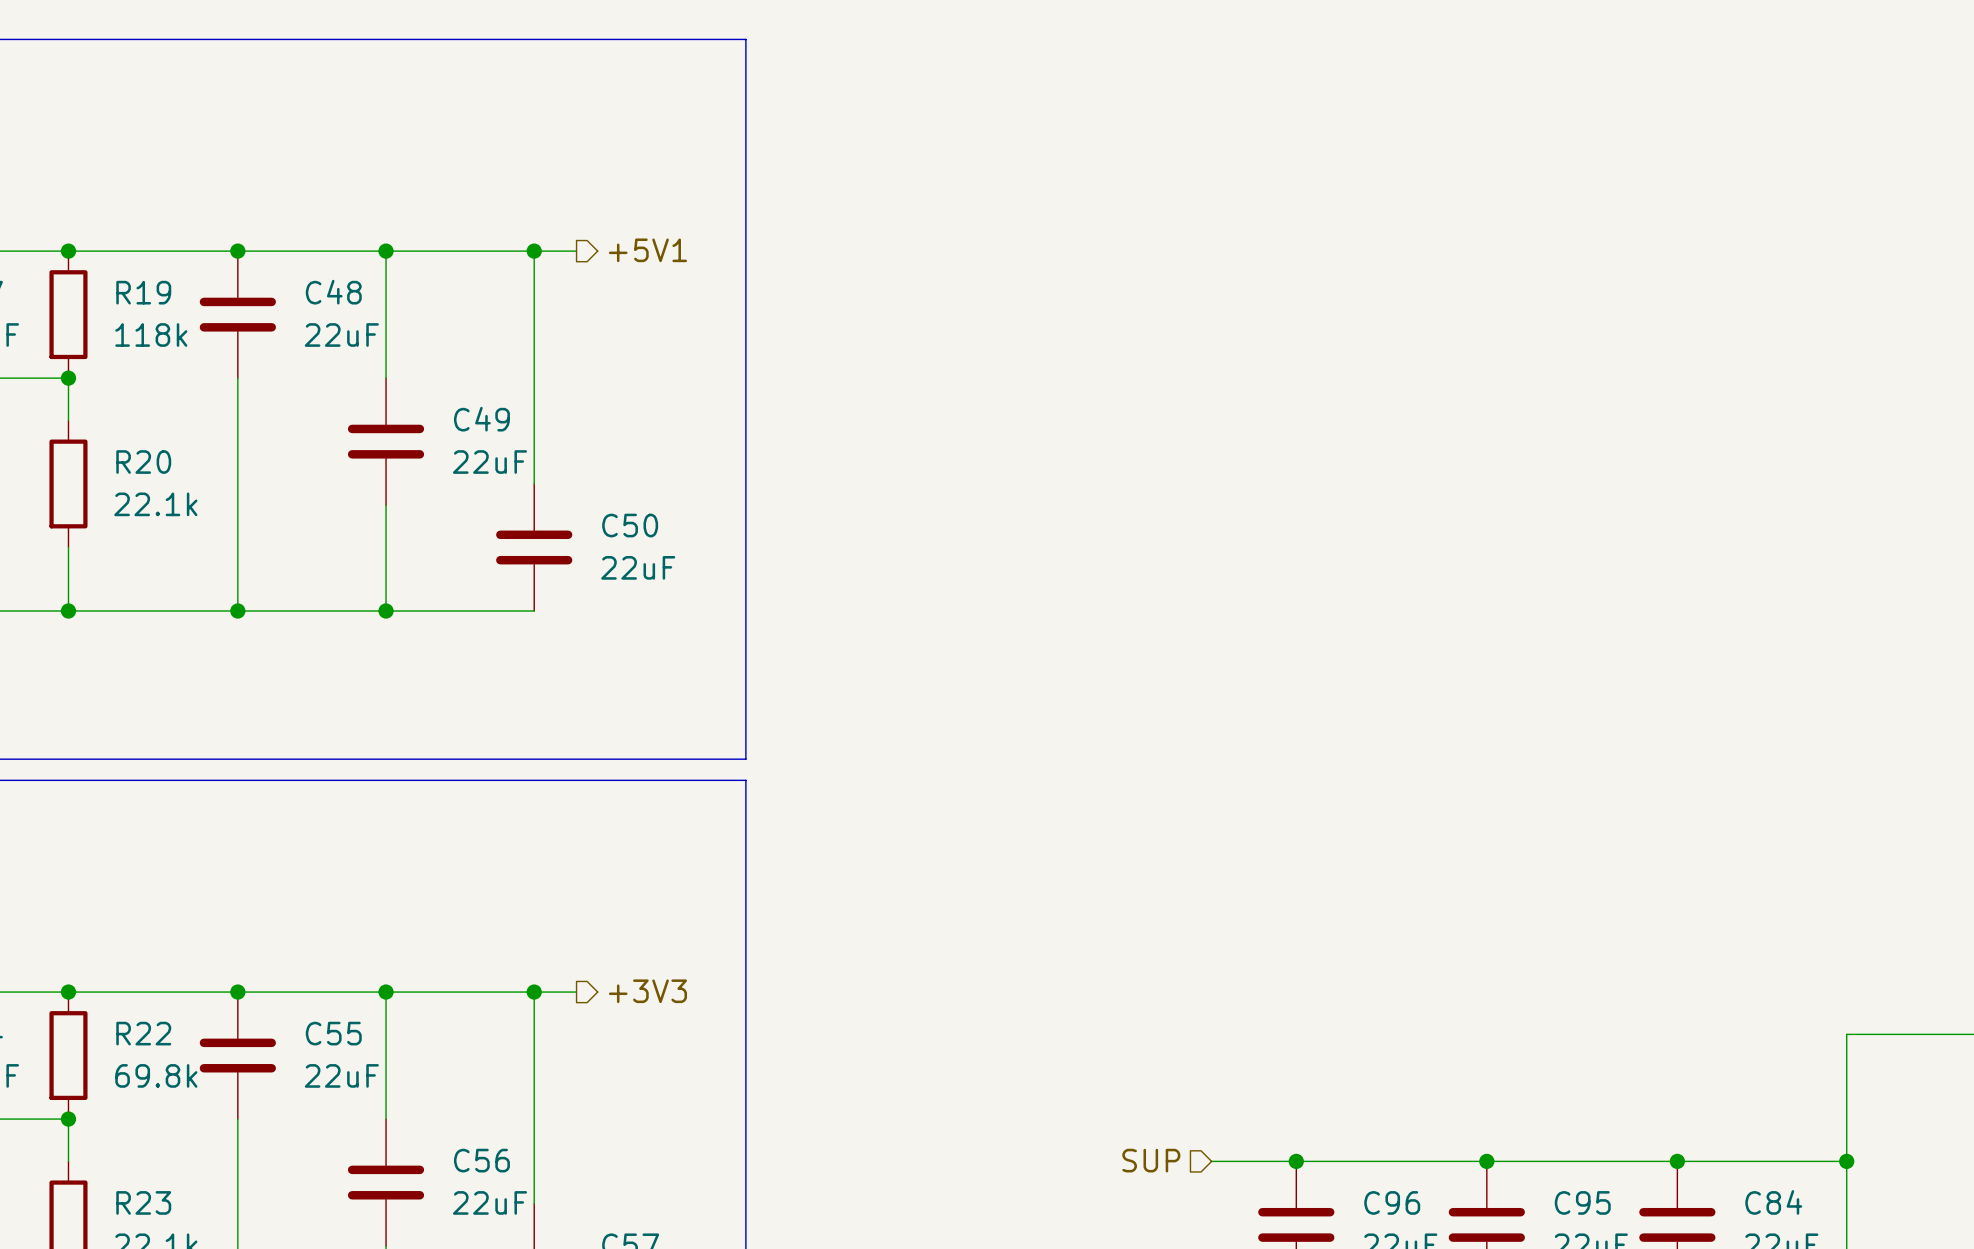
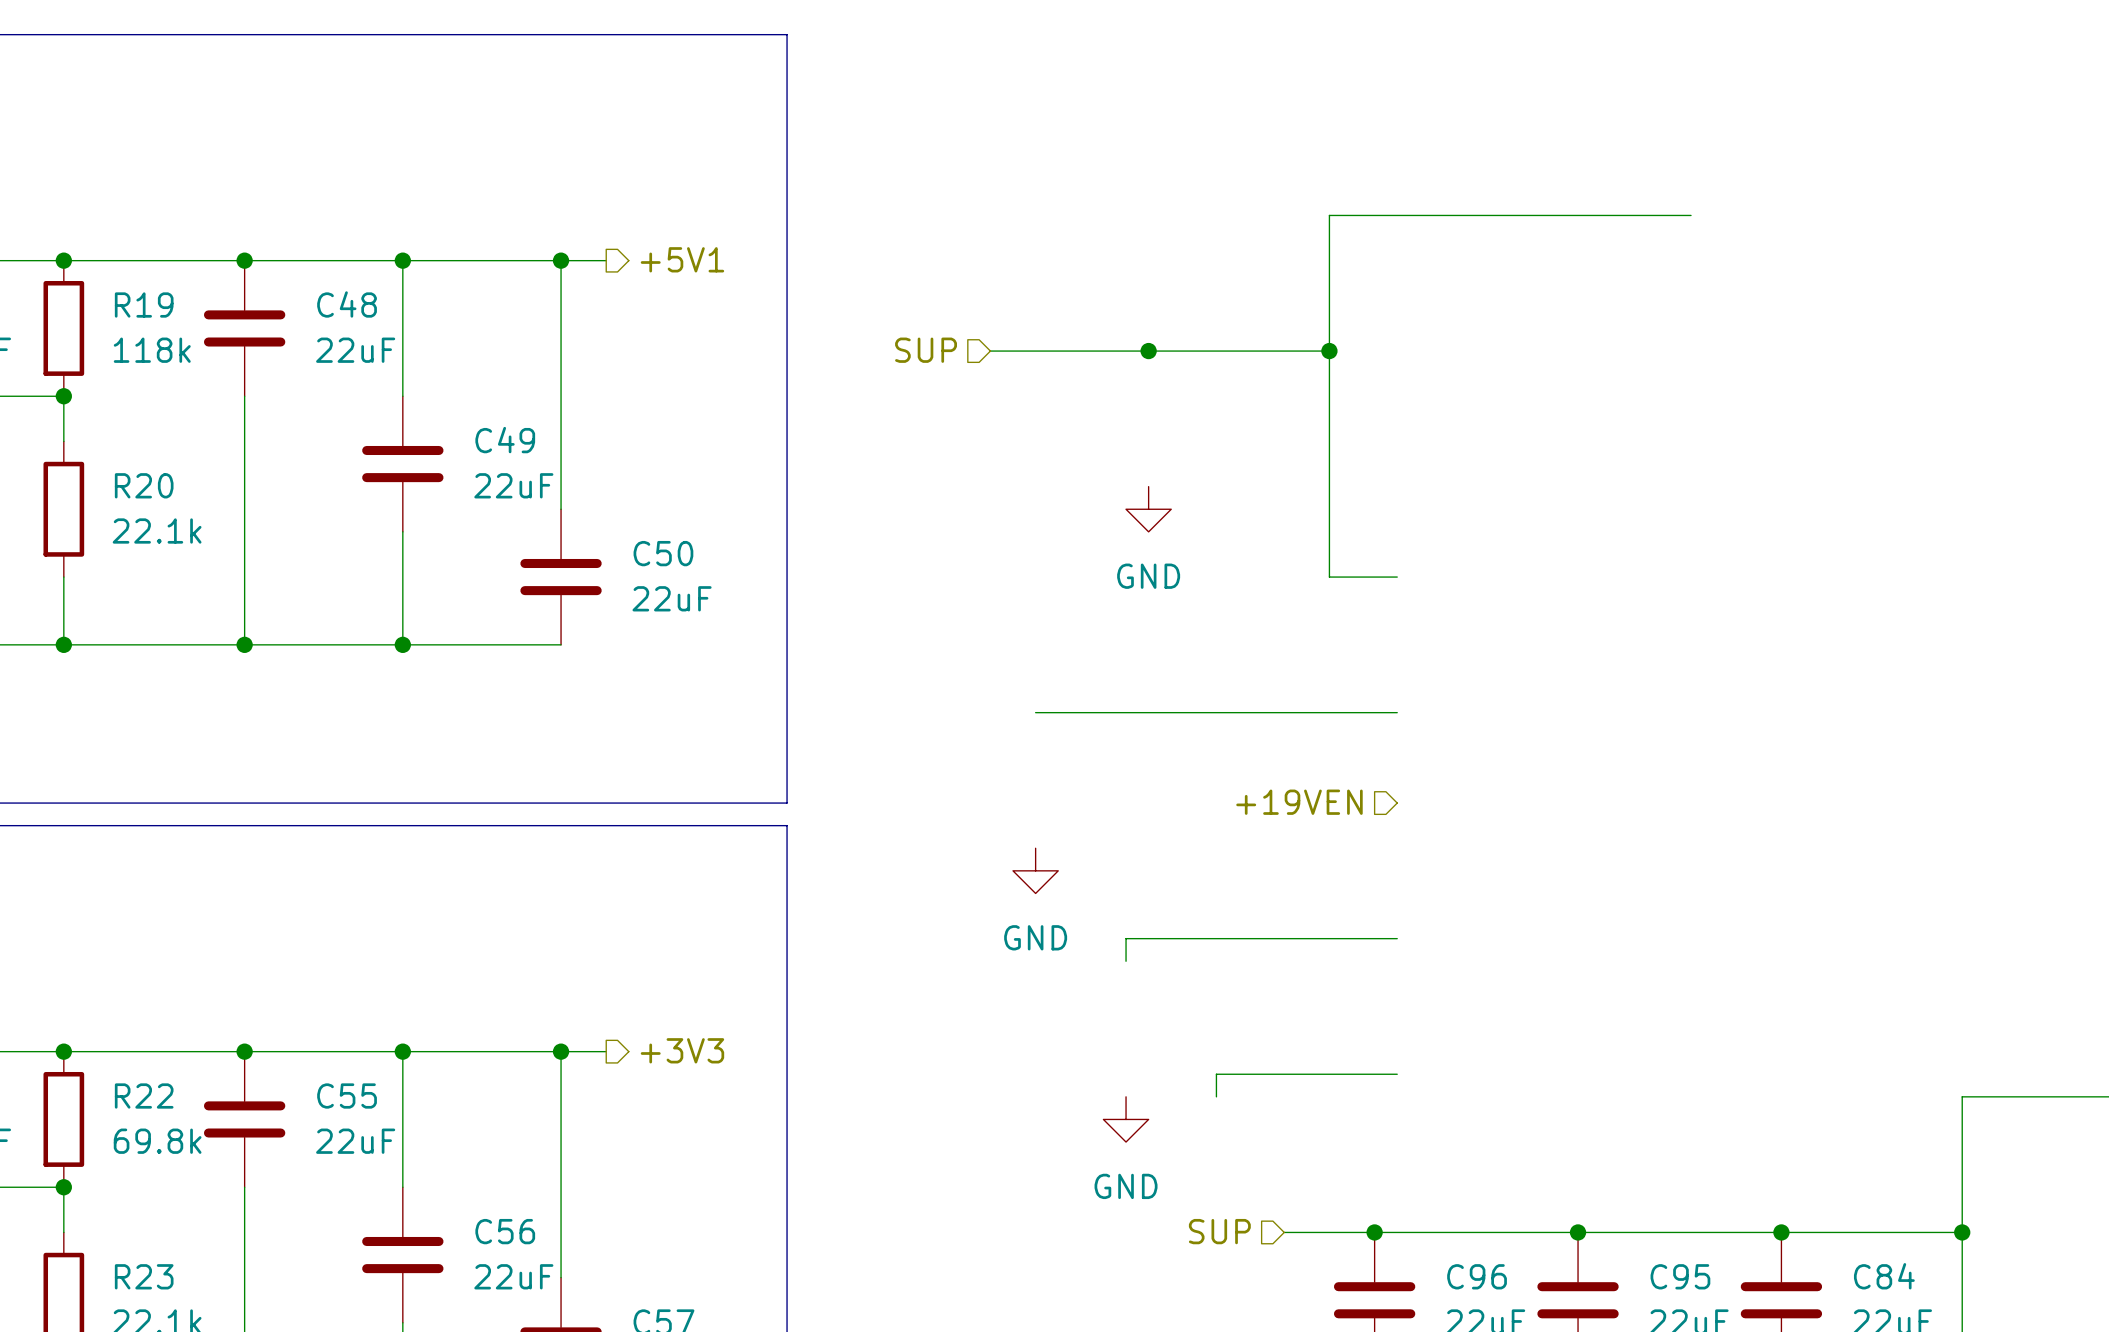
wire: none -> (1691, 215) (1329, 215) (1329, 577) (1397, 577)
hierarchical label: none -> SUP (926, 350)
wire: none -> (990, 351) (1329, 351)
junction: none -> (1148, 351)
junction: none -> (1329, 351)
power symbol: none -> GND (1148, 509)
wire: none -> (1035, 712) (1397, 712)
hierarchical label: none -> +19VEN (1299, 802)
power symbol: none -> GND (1035, 870)
wire: none -> (1397, 938) (1126, 938) (1126, 961)
wire: none -> (1397, 1074) (1216, 1074) (1216, 1096)
power symbol: none -> GND (1126, 1119)

